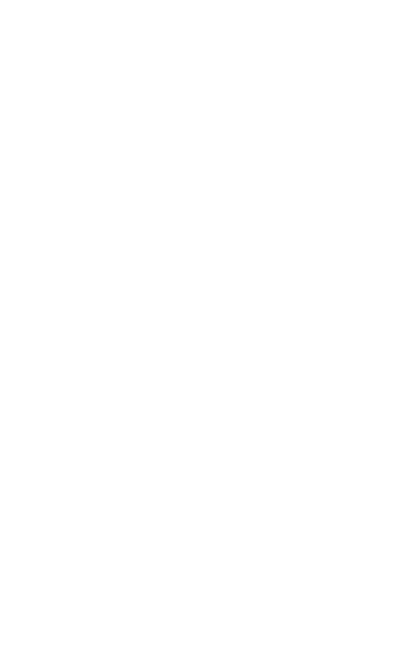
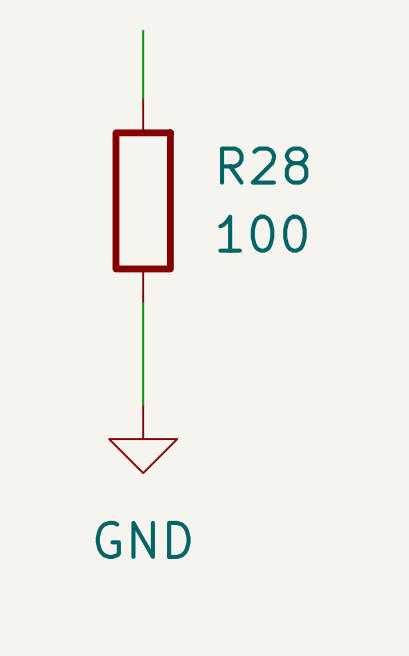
wire: none -> (143, 30) (143, 98)
R28: none -> 100 (143, 200)
wire: none -> (143, 302) (143, 405)
power symbol: none -> GND (143, 439)

